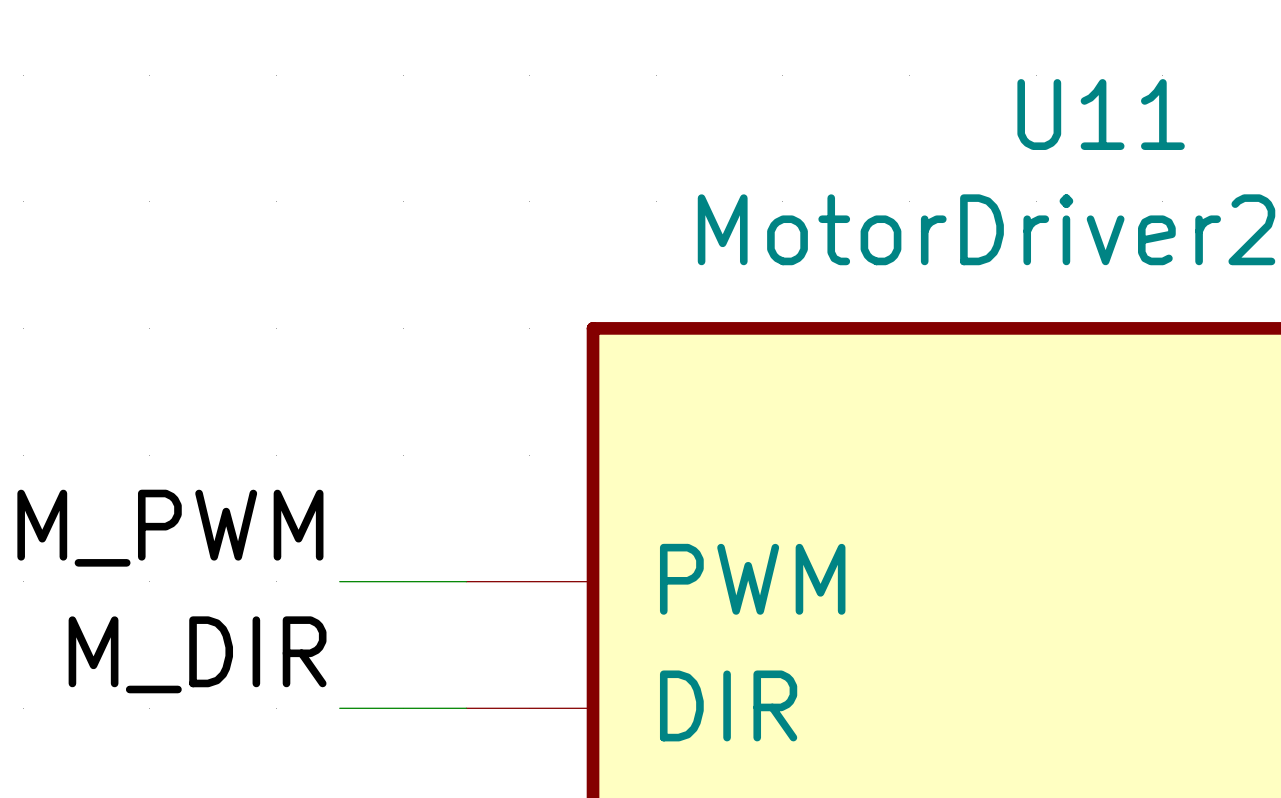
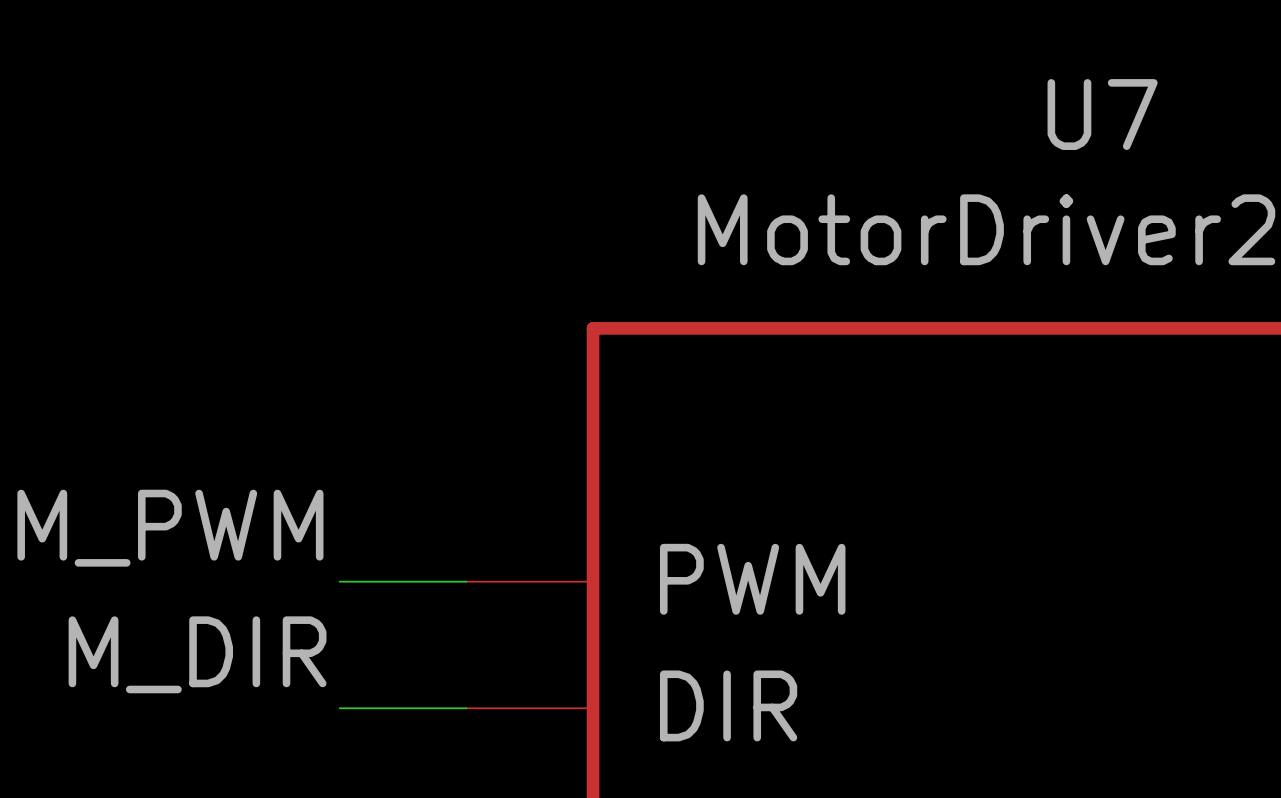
U11 name: U11 (1101, 114) -> U7 (1102, 114)

